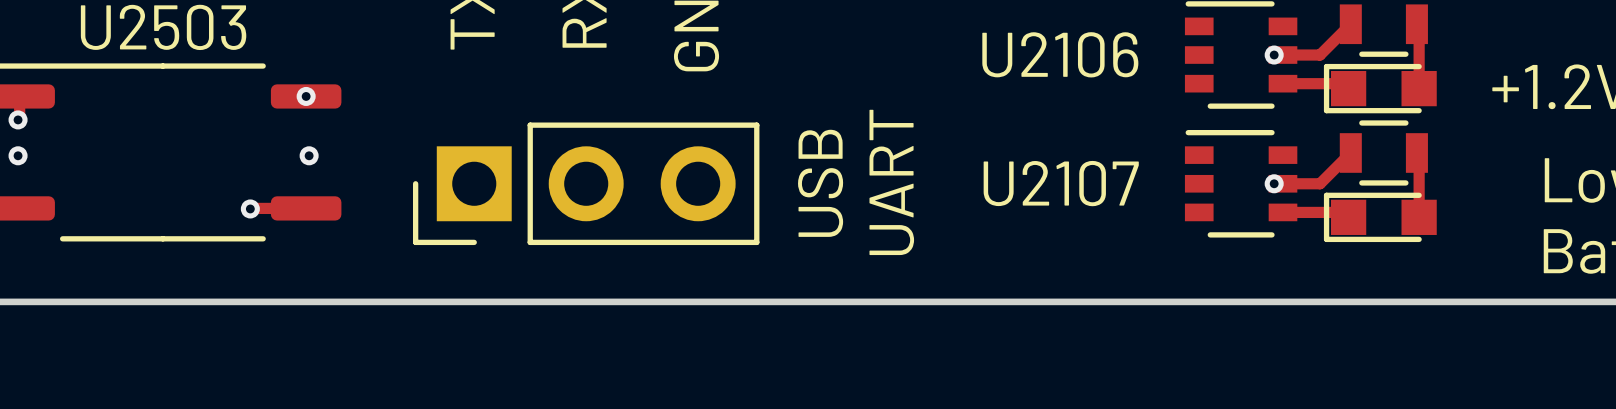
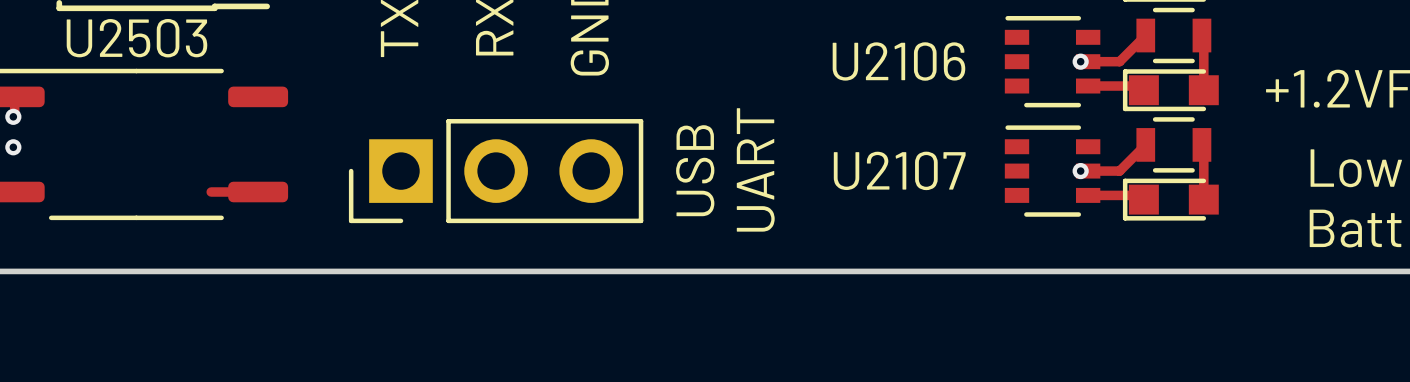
via: (306, 96) -> none
via: (309, 155) -> none
via: (250, 208) -> none

